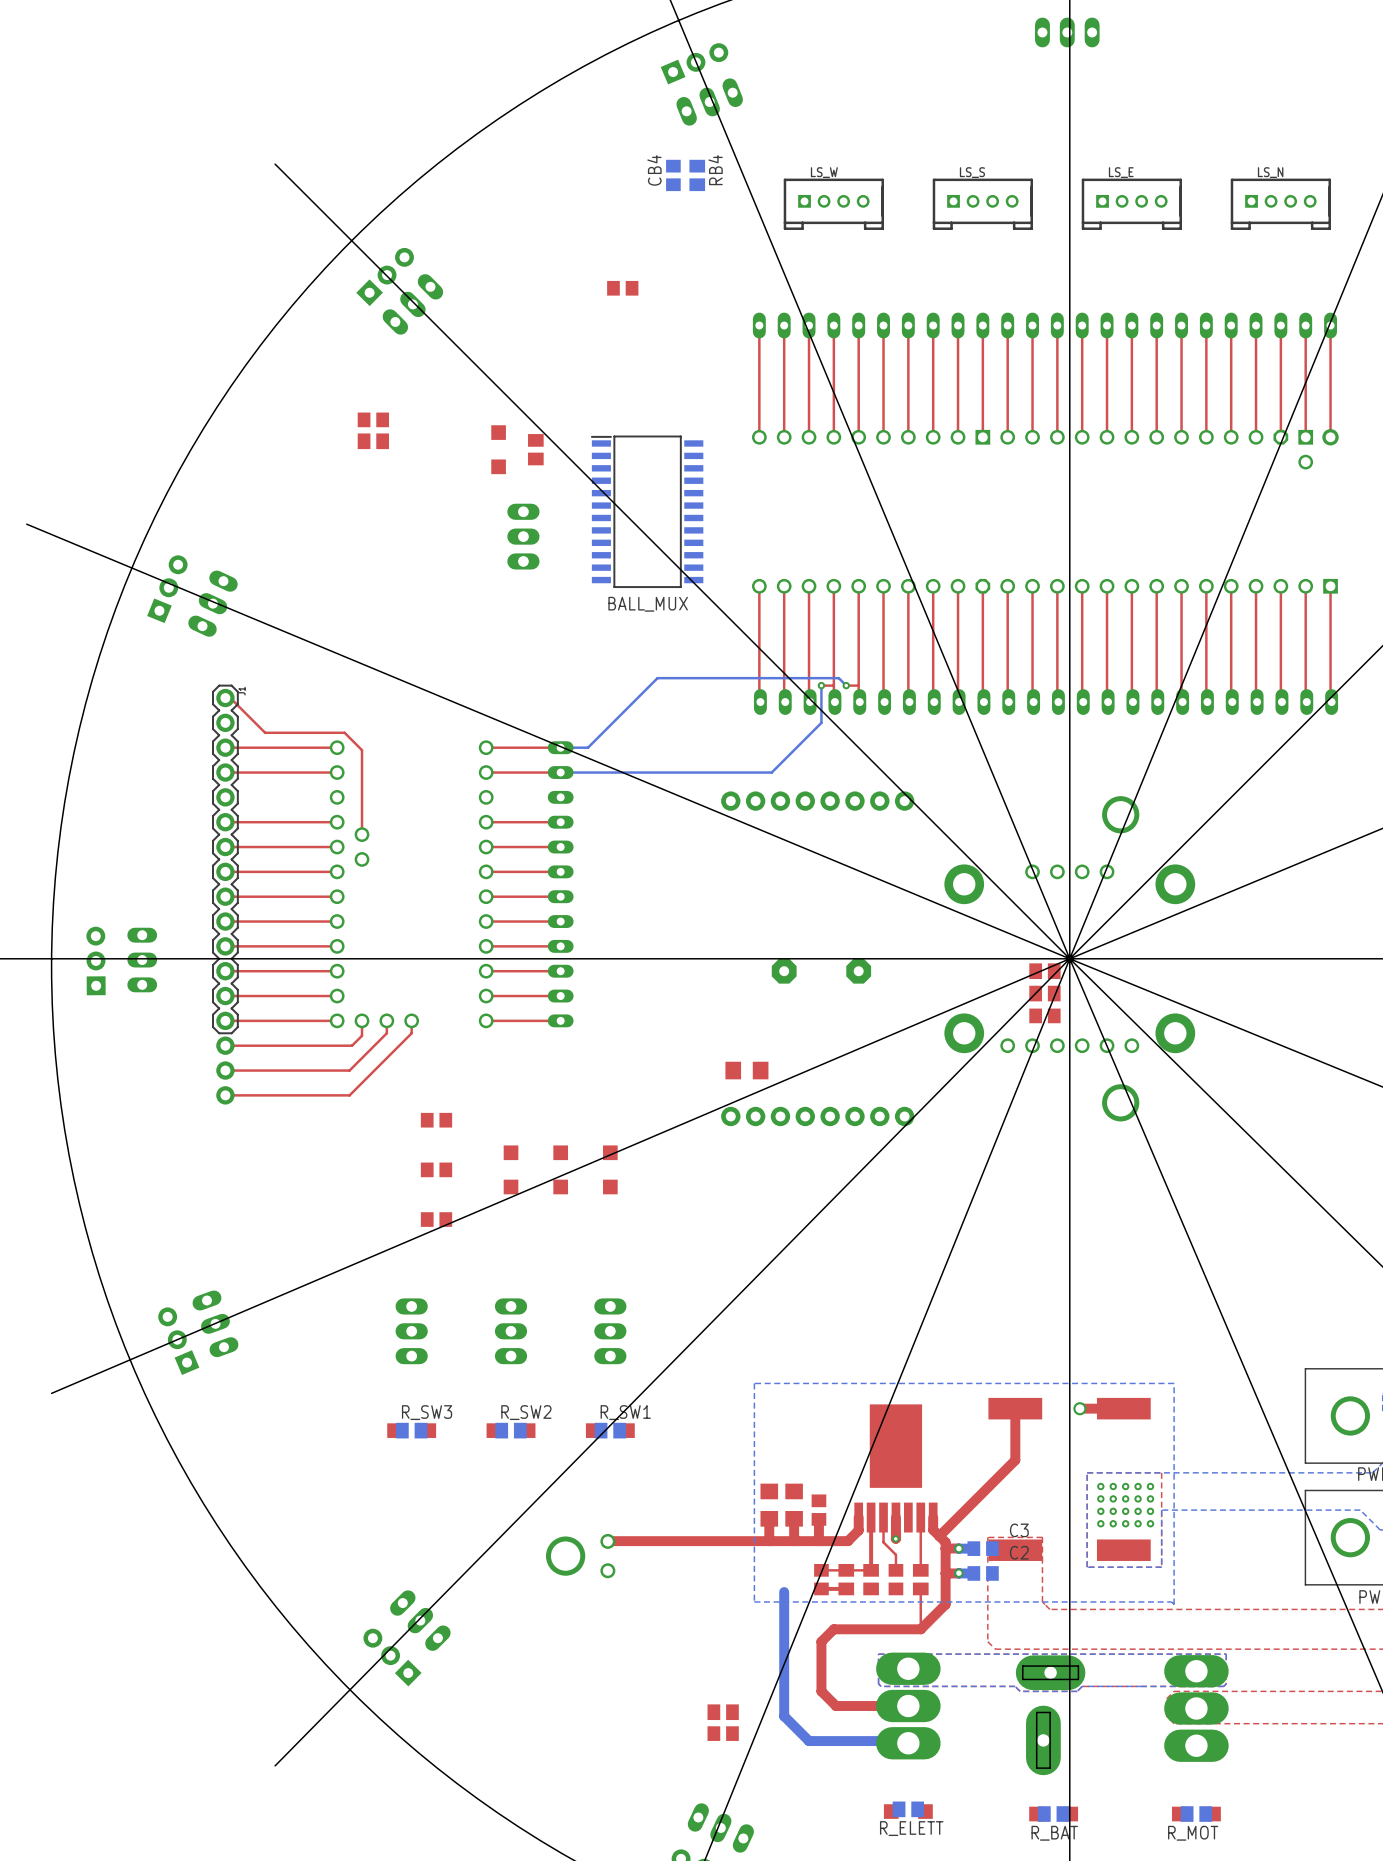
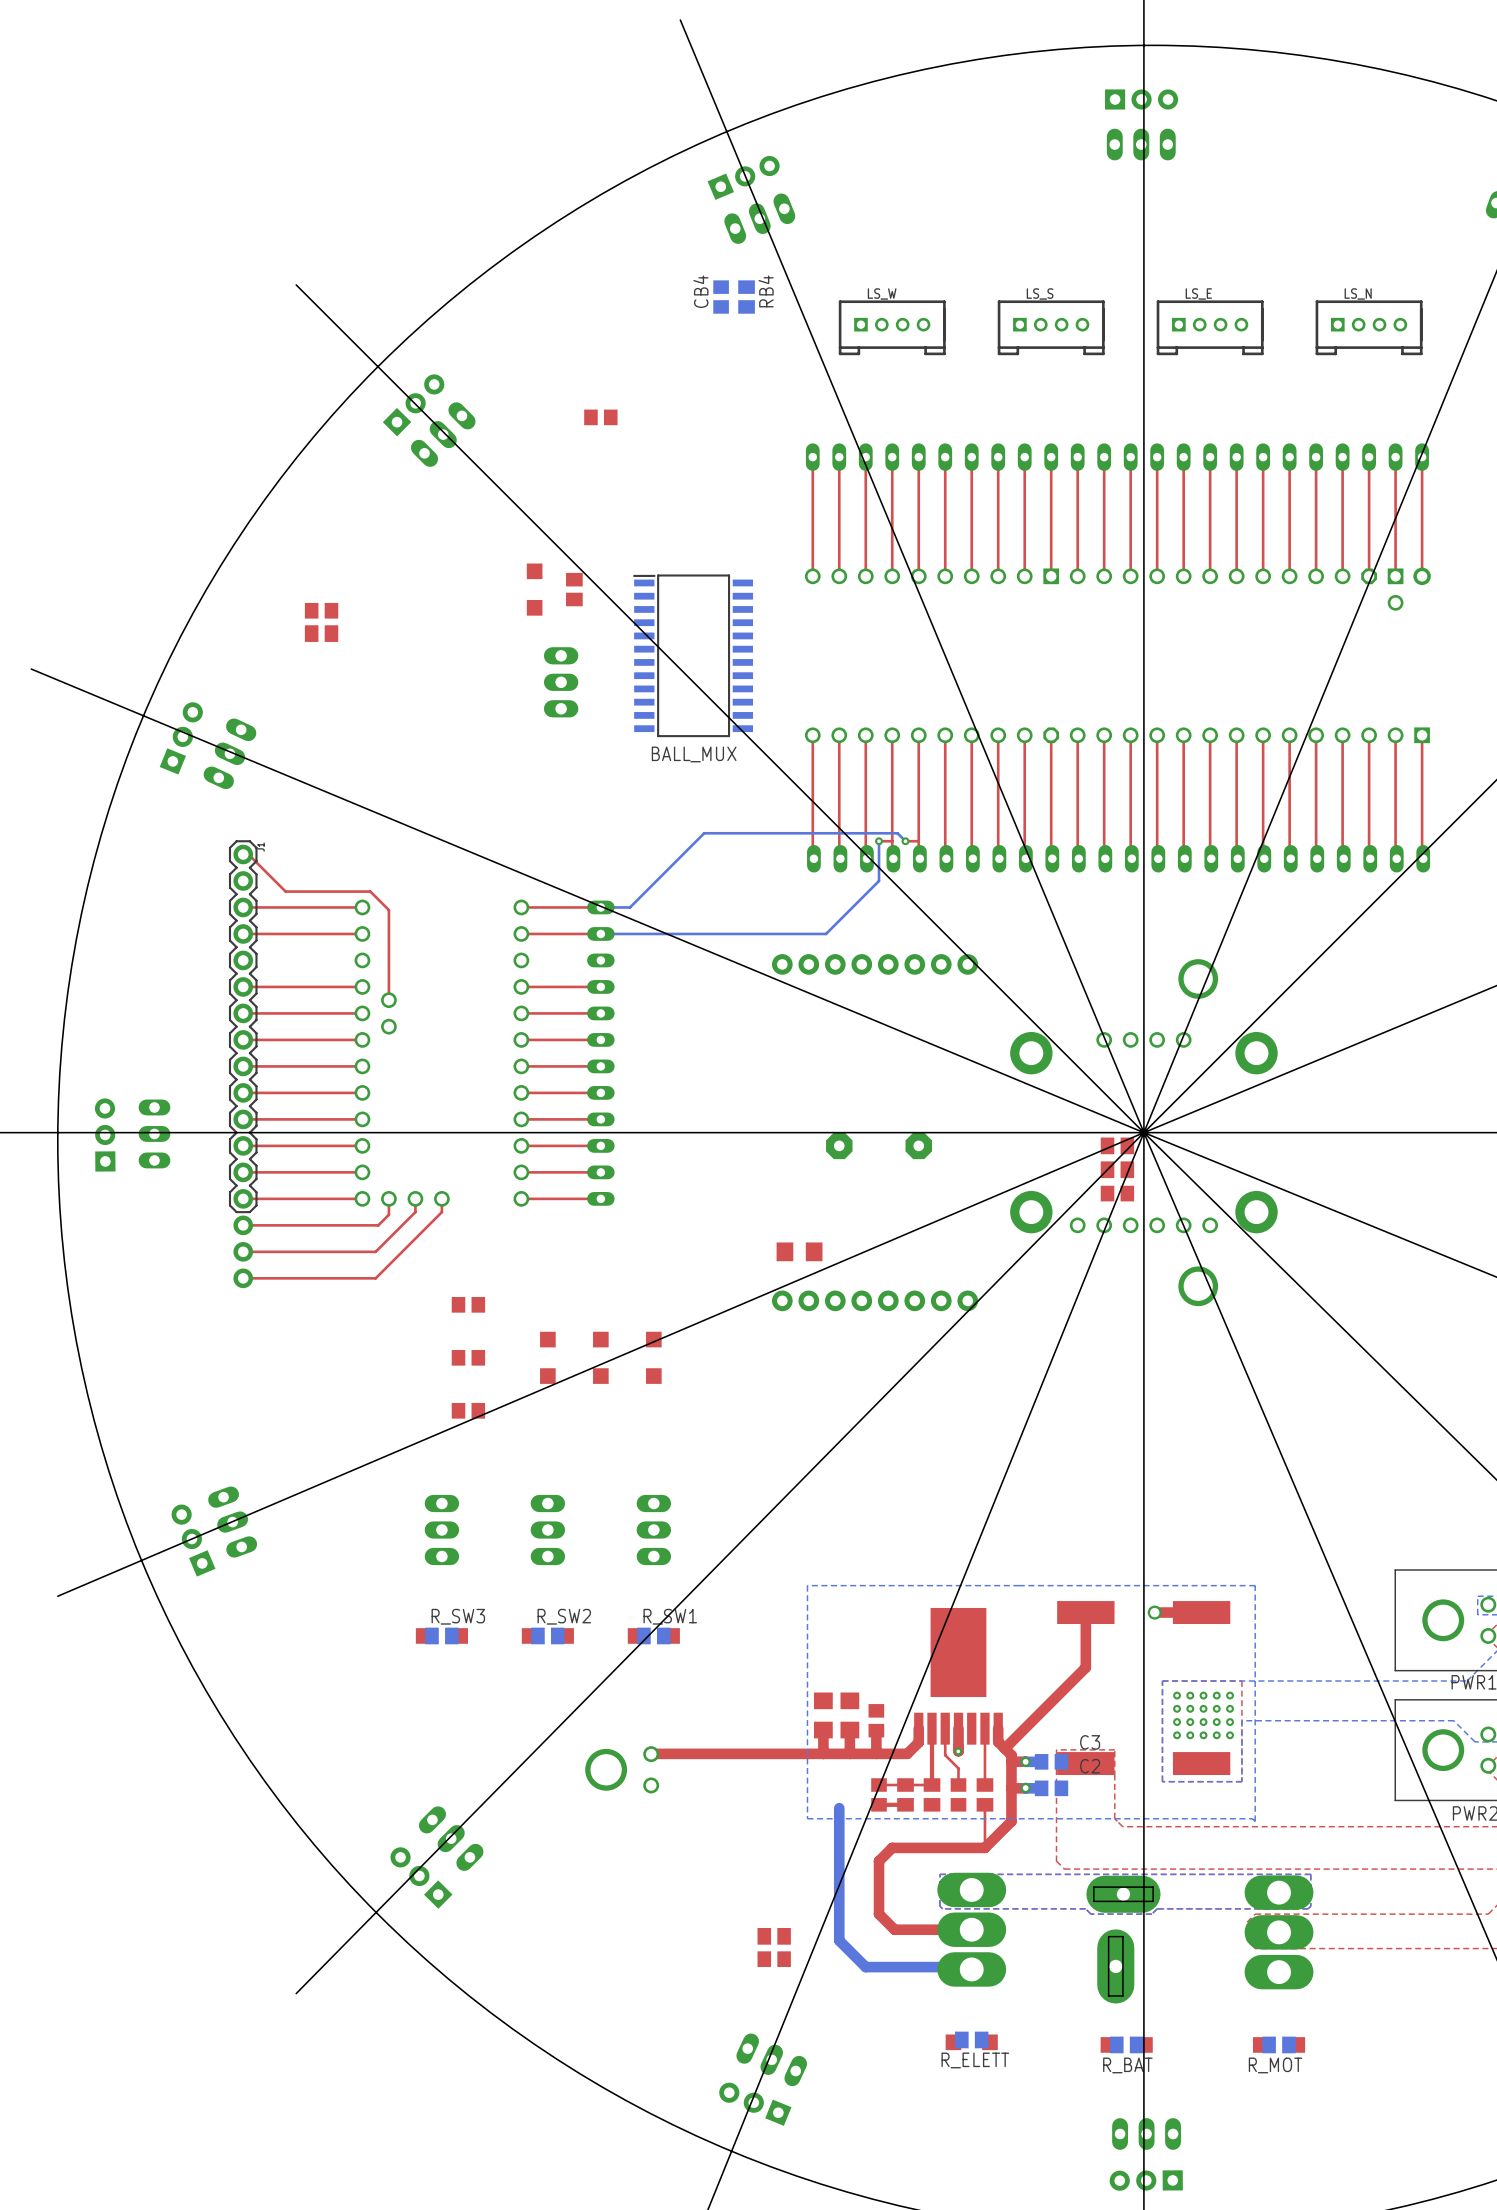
part position: (622, 288) -> (600, 417)
part position: (373, 419) -> (321, 610)
part position: (373, 441) -> (321, 633)

